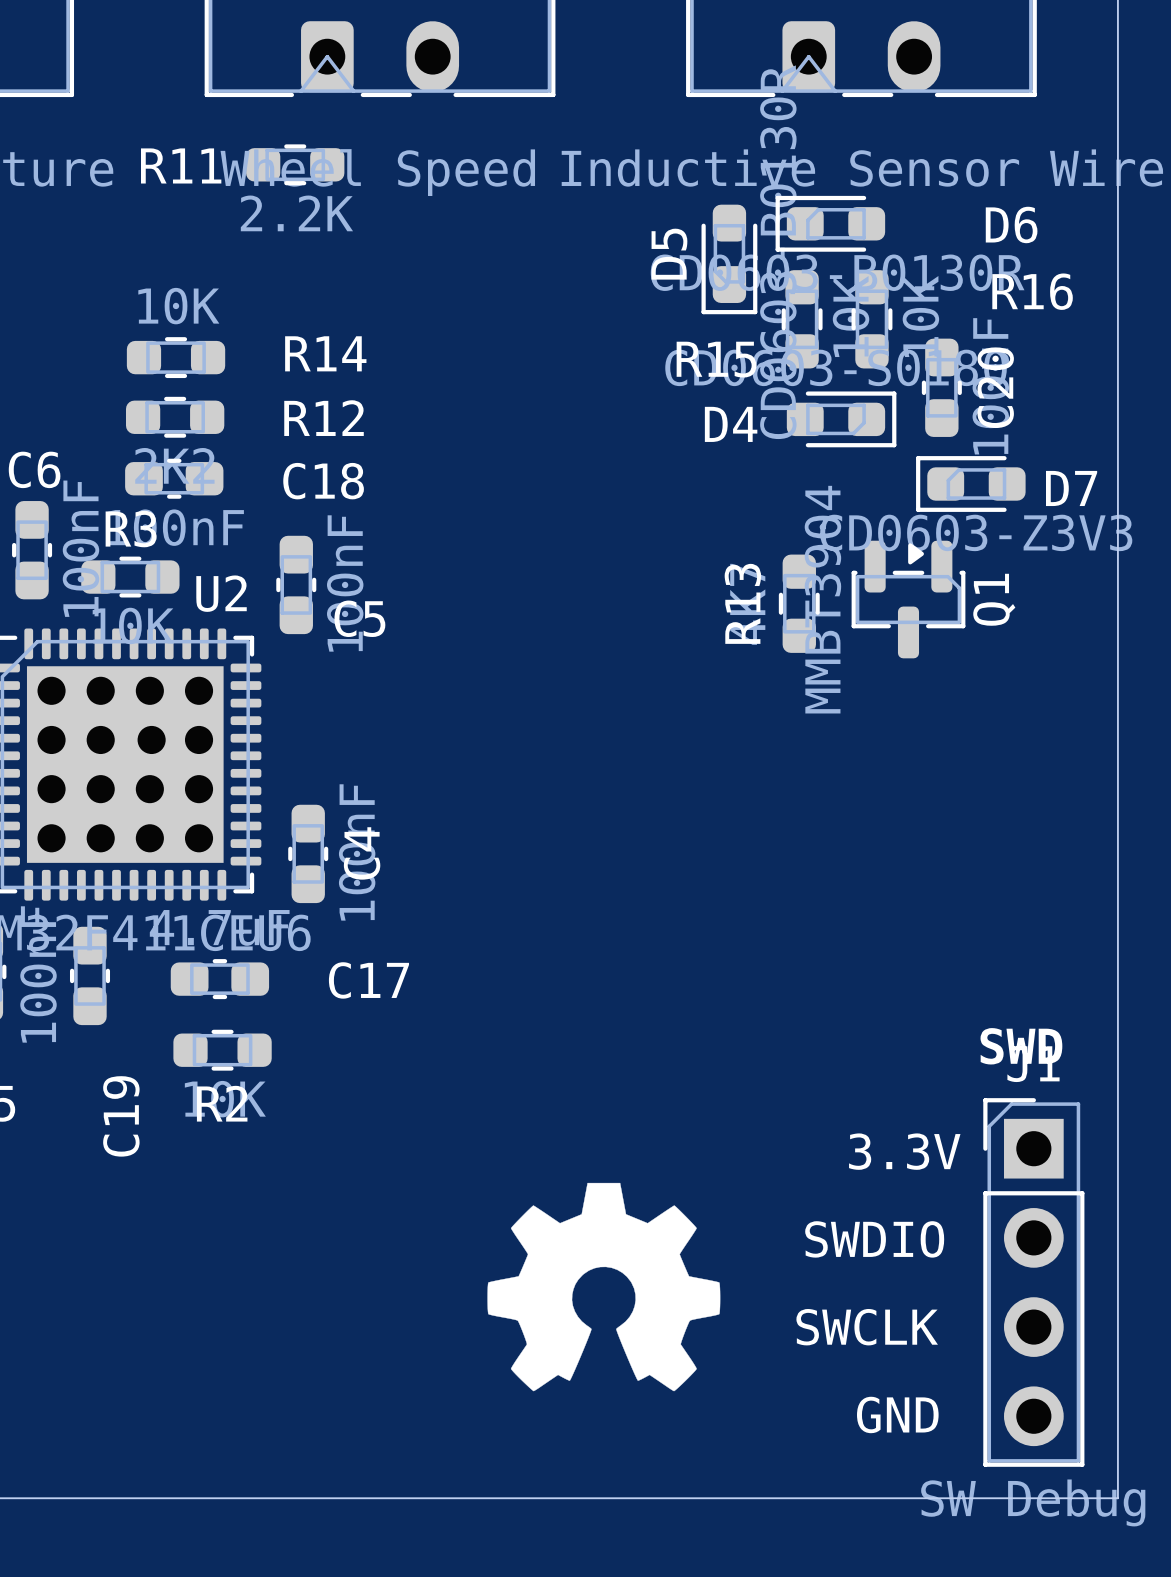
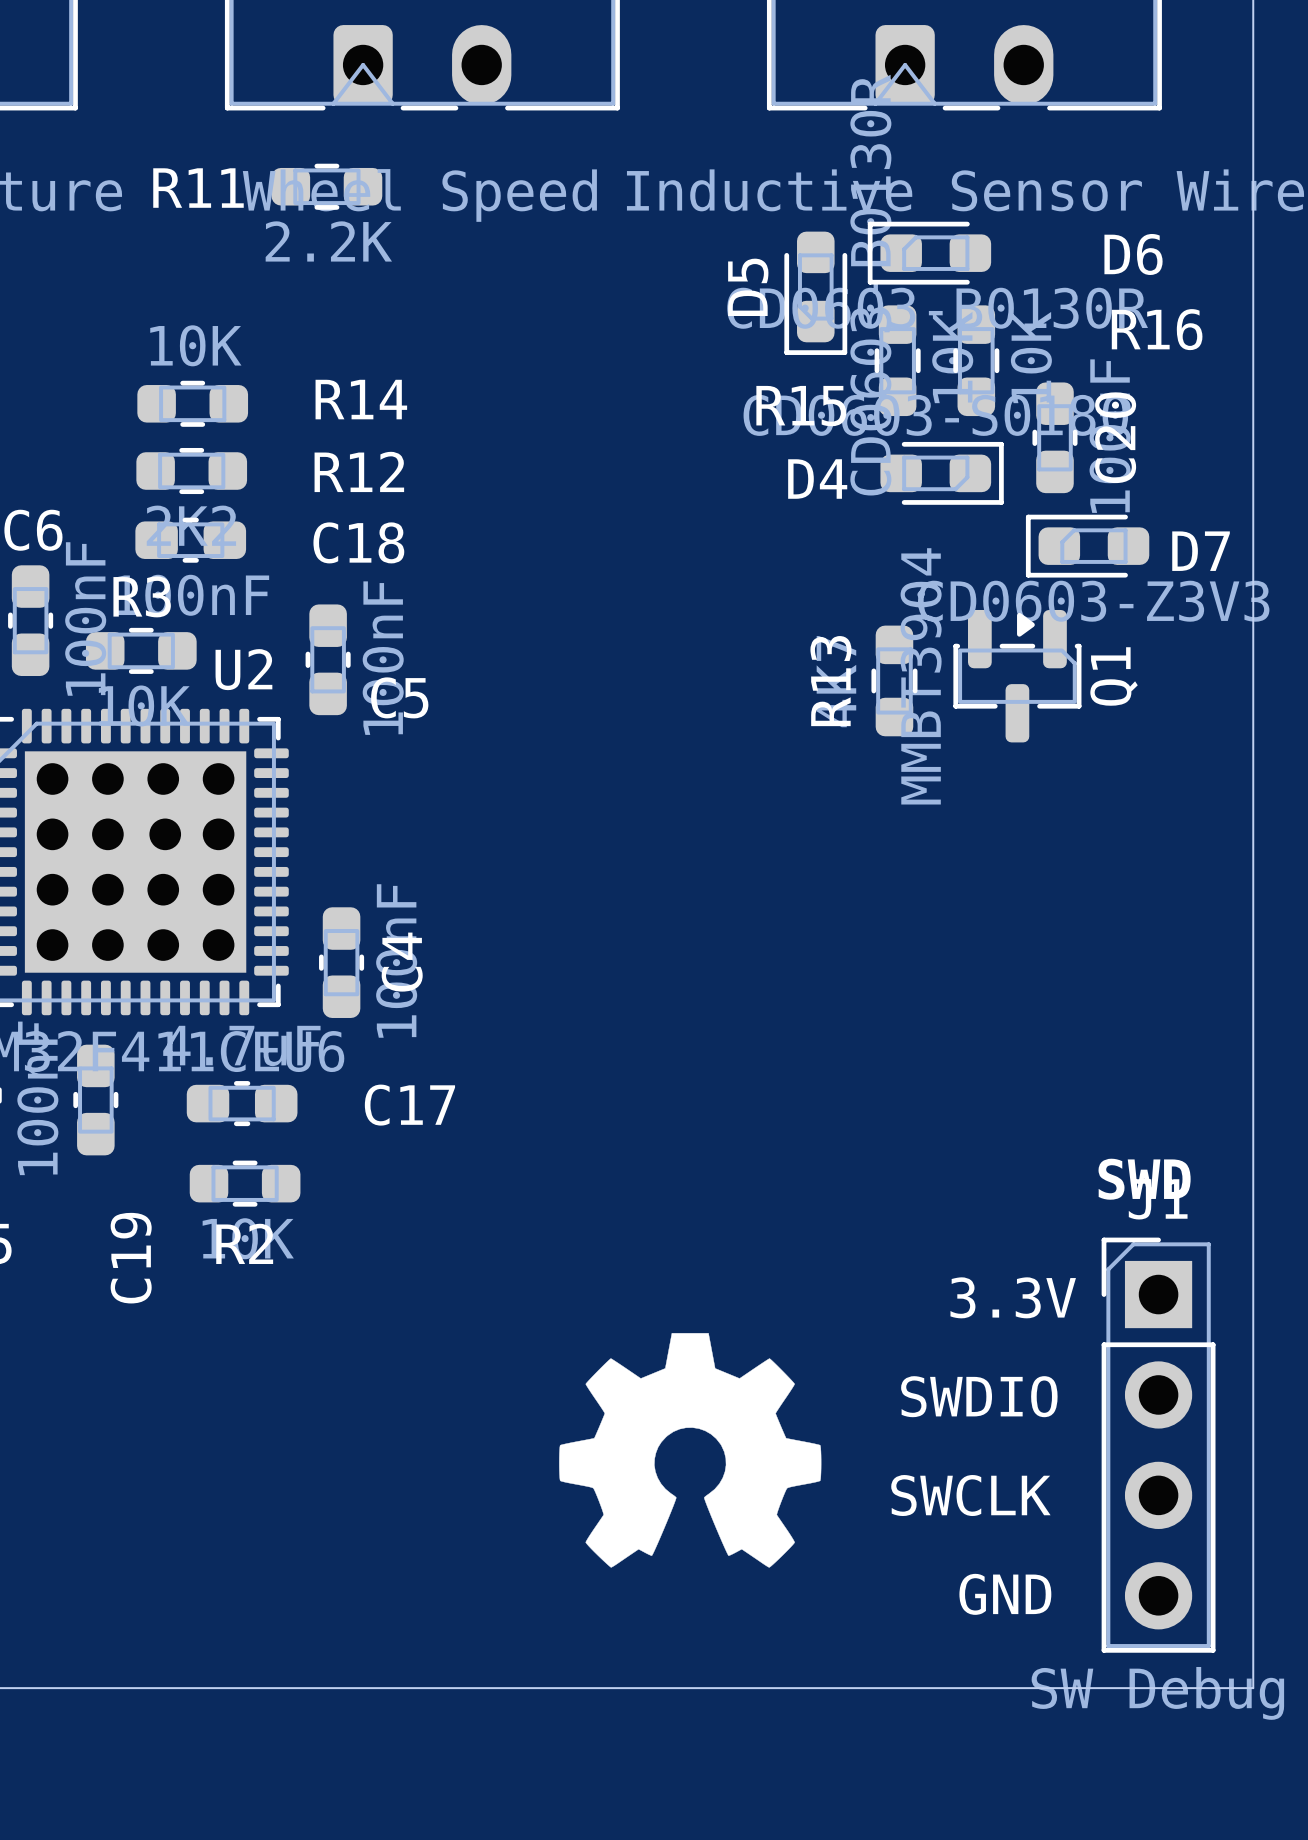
drawing position: (603, 1287) -> (690, 1450)

